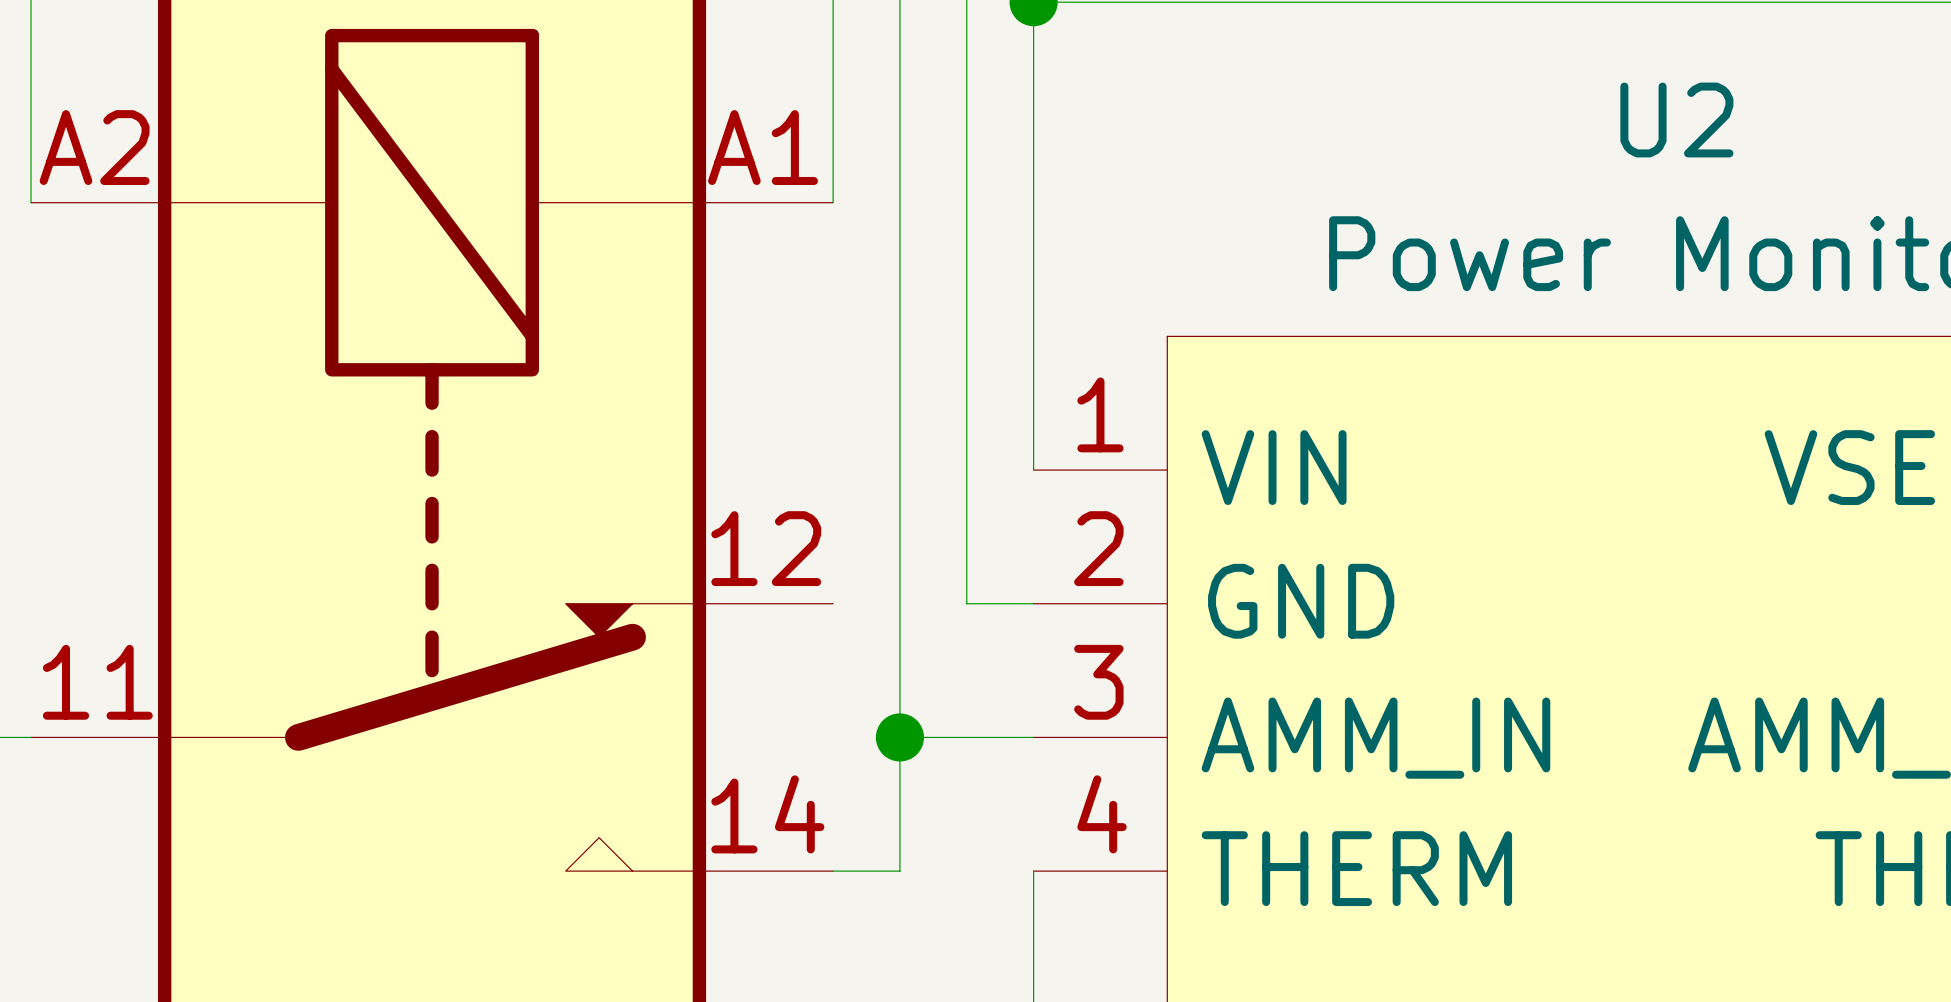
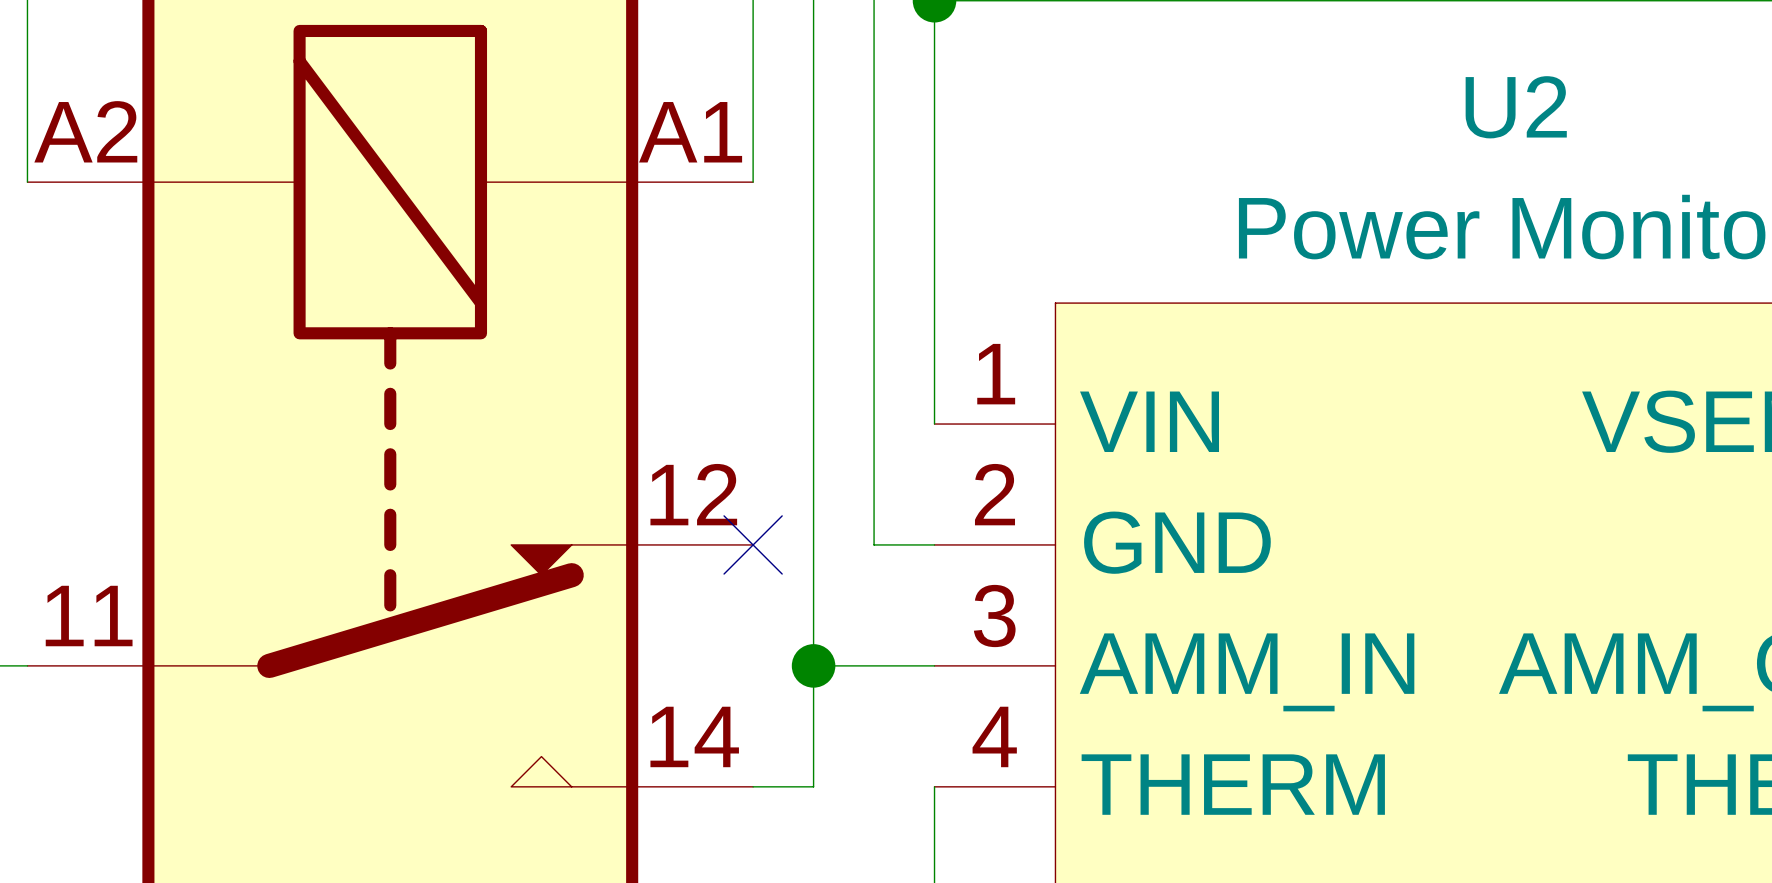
no-connect mark: none -> (753, 544)

